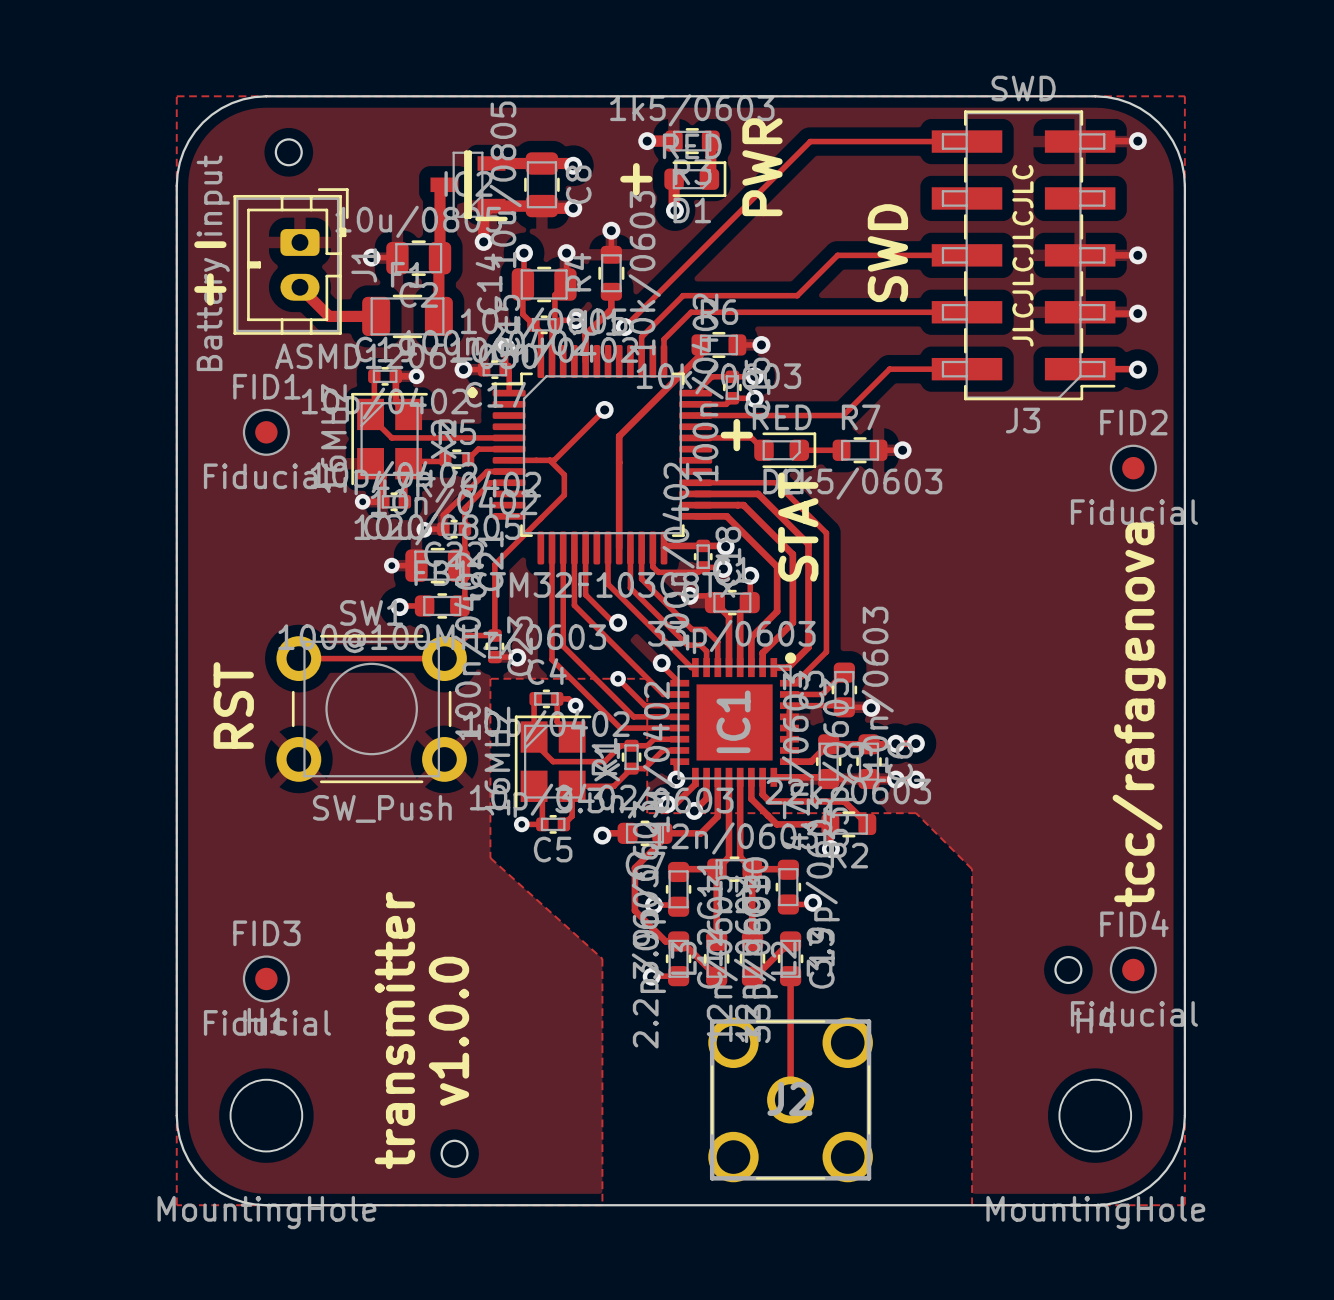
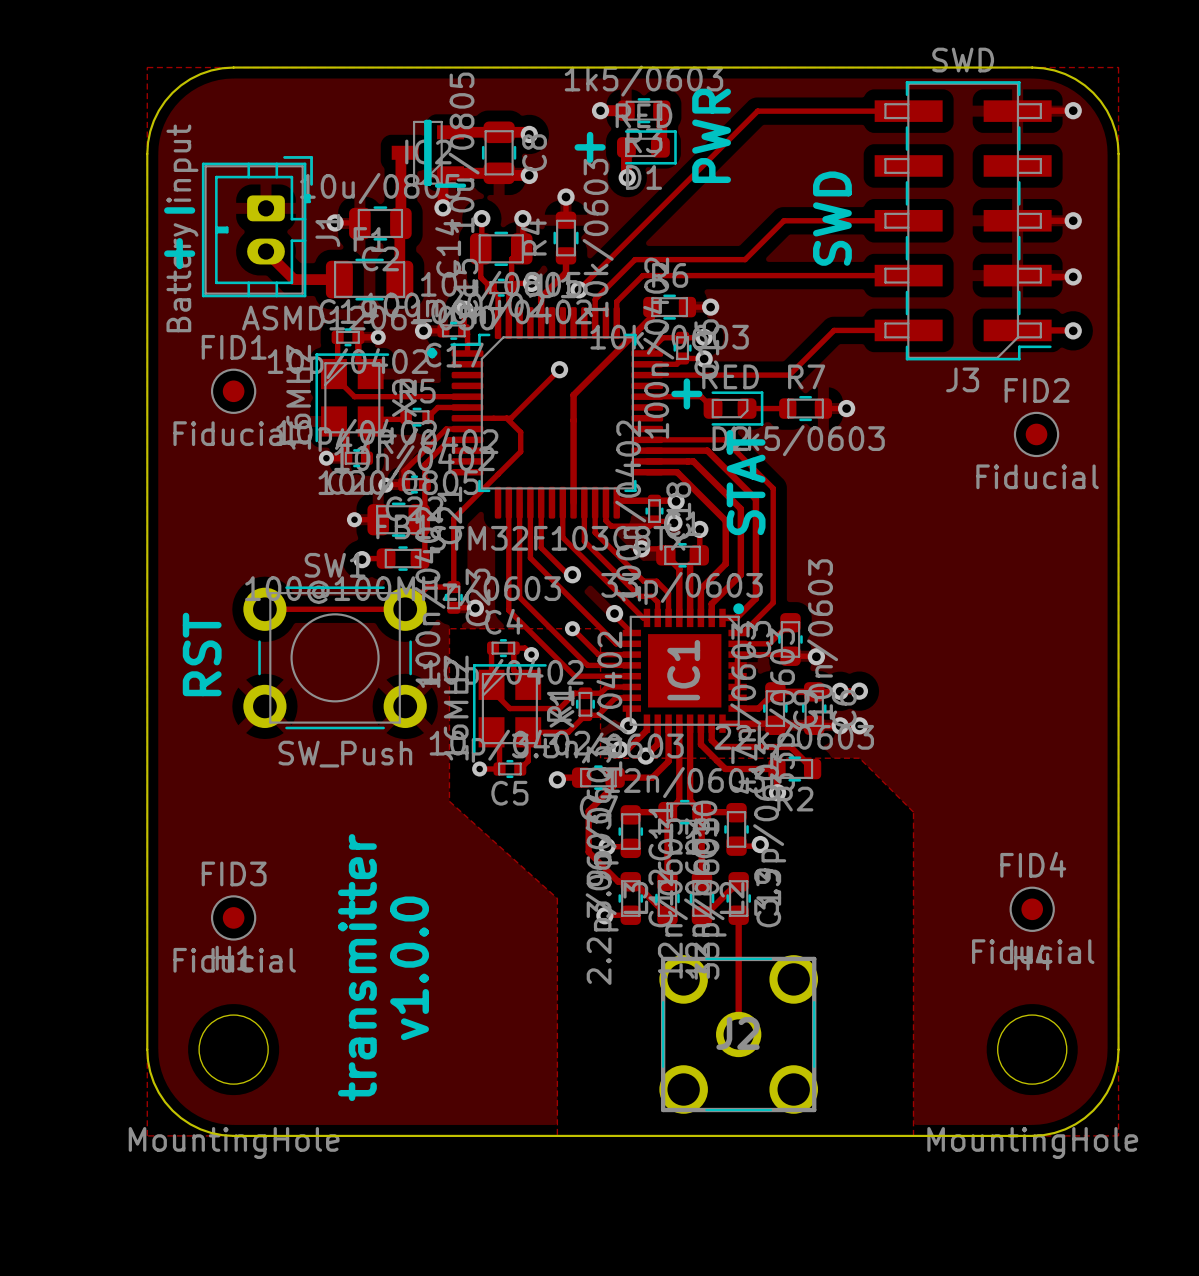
round board edge: [274, 138, 303, 167] -> none
text: JLCJLCJLCJLC (1022, 255) -> none
FID2 position: (1133, 468) -> (1036, 434)
text: tcc/rafagenova (1139, 714) -> none
round board edge: [1054, 955, 1083, 985] -> none
FID4 position: (1133, 970) -> (1032, 909)
round board edge: [440, 1139, 469, 1168] -> none

